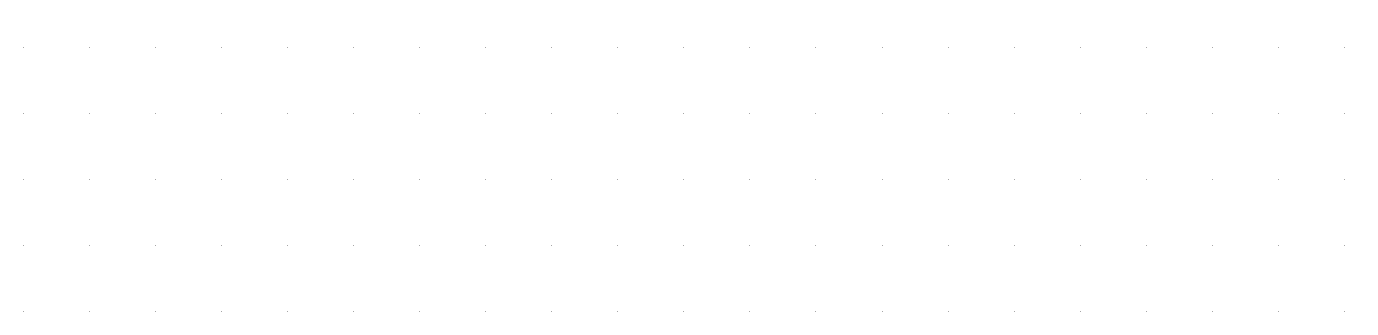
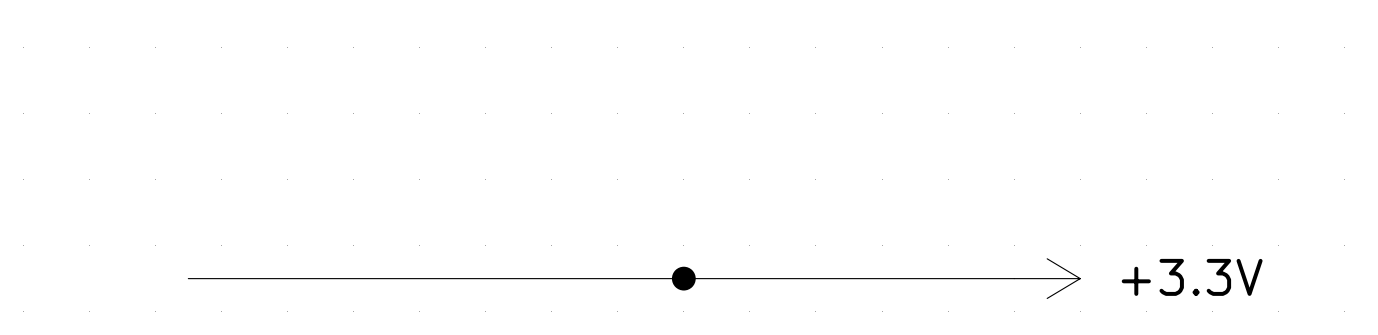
wire: none -> (188, 278) (1014, 278)
junction: none -> (683, 278)
power symbol: none -> +3.3V (1047, 278)

